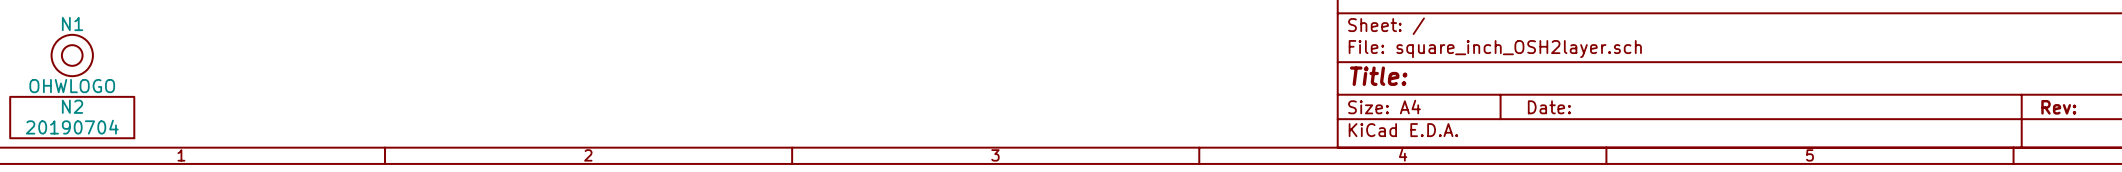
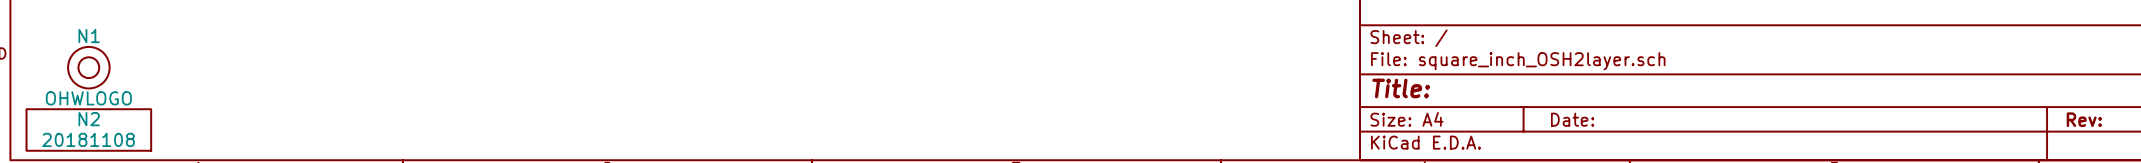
N2 value: 20190704 (72, 127) -> 20181108 (88, 139)

